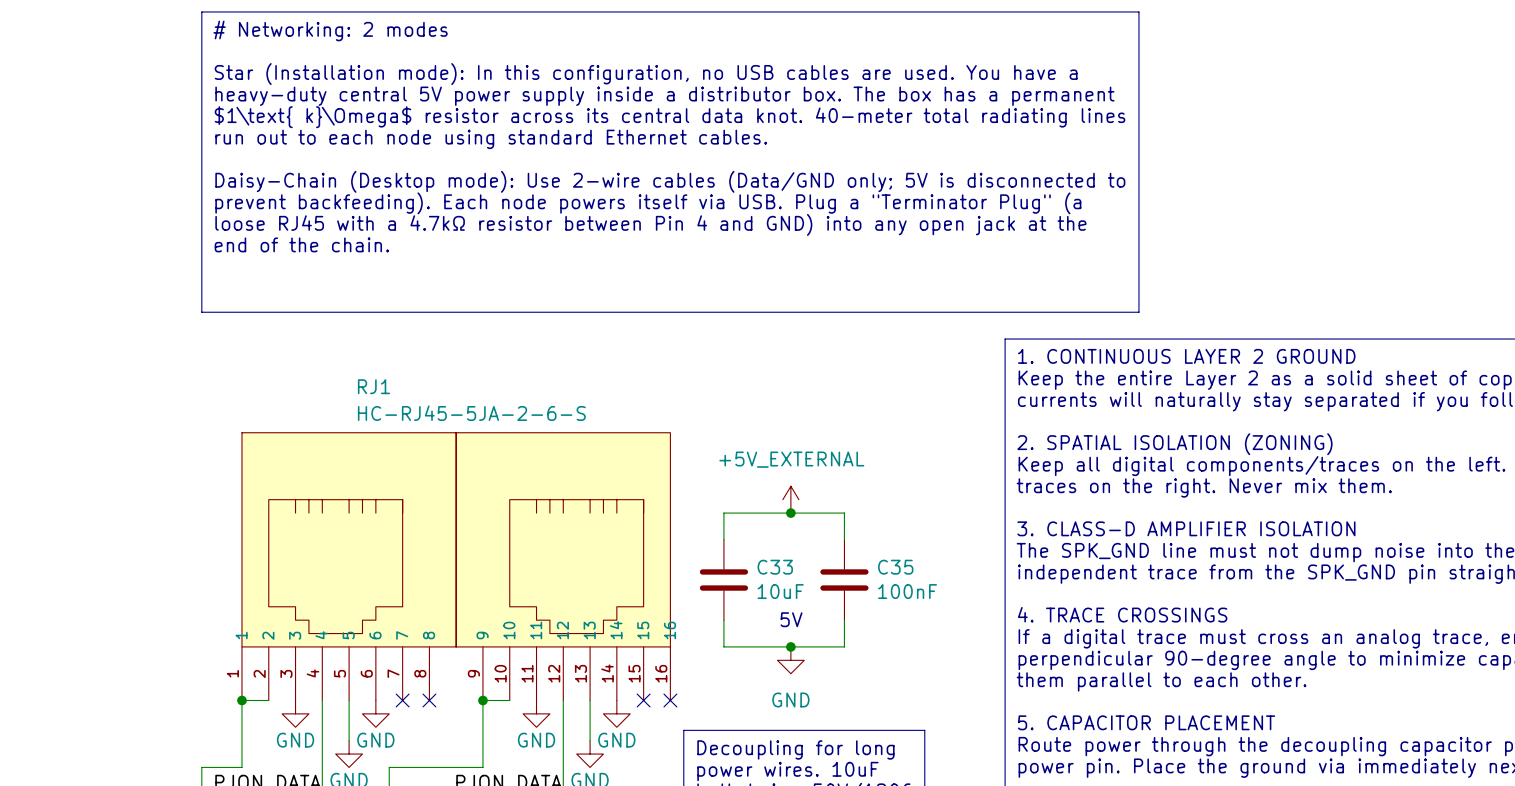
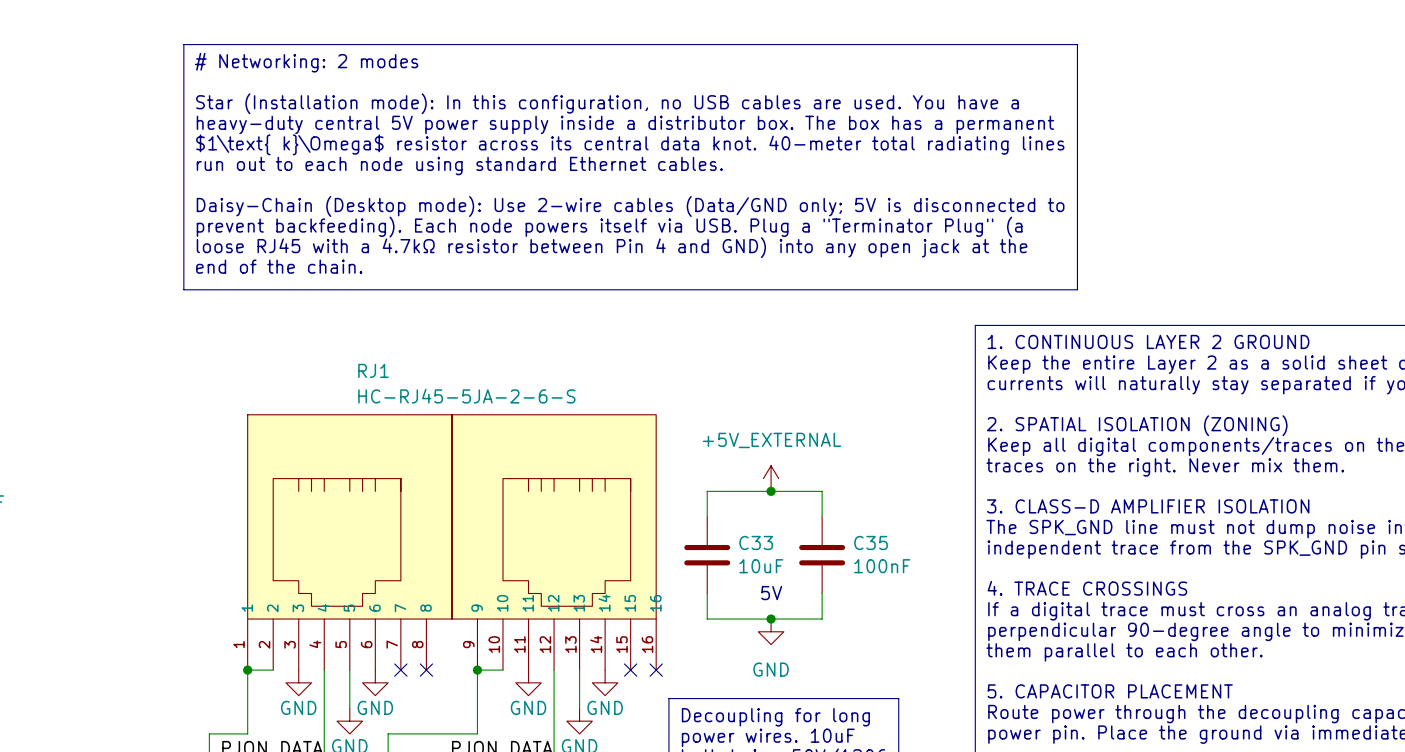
line: (201, 11) (1138, 11) (1138, 312) (201, 312) (201, 11) -> (183, 44) (183, 289) (1077, 289) (1077, 44) (183, 44)
text position: # Networking: 2 modes (330, 30) -> # Networking: 2 modes (306, 62)
text position: Star (Installation mode): In this configuration, no USB cables are used. You have a (646, 74) -> Star (Installation mode): In this configuration, no USB cables are used. You have a (607, 103)
text position: heavy-duty central 5V power supply inside a distributor box. The box has a permanent (664, 96) -> heavy-duty central 5V power supply inside a distributor box. The box has a permanent (625, 124)
text position: $1\text{ k}\Omega$ resistor across its central data knot. 40-meter total radiating lines (670, 117) -> $1\text{ k}\Omega$ resistor across its central data knot. 40-meter total radiating lines (630, 144)
text position: run out to each node using standard Ethernet cables. (491, 139) -> run out to each node using standard Ethernet cables. (459, 166)
text position: Daisy-Chain (Desktop mode): Use 2-wire cables (Data/GND only; 5V is disconnected to (670, 181) -> Daisy-Chain (Desktop mode): Use 2-wire cables (Data/GND only; 5V is disconnected to (630, 206)
text position: prevent backfeeding). Each node powers itself via USB. Plug a "Terminator Plug" (a (648, 203) -> prevent backfeeding). Each node powers itself via USB. Plug a "Terminator Plug" (a (609, 227)
text position: loose RJ45 with a 4.7kΩ resistor between Pin 4 and GND) into any open jack at the (650, 224) -> loose RJ45 with a 4.7kΩ resistor between Pin 4 and GND) into any open jack at the (612, 247)
text position: end of the chain. (301, 244) -> end of the chain. (279, 266)

